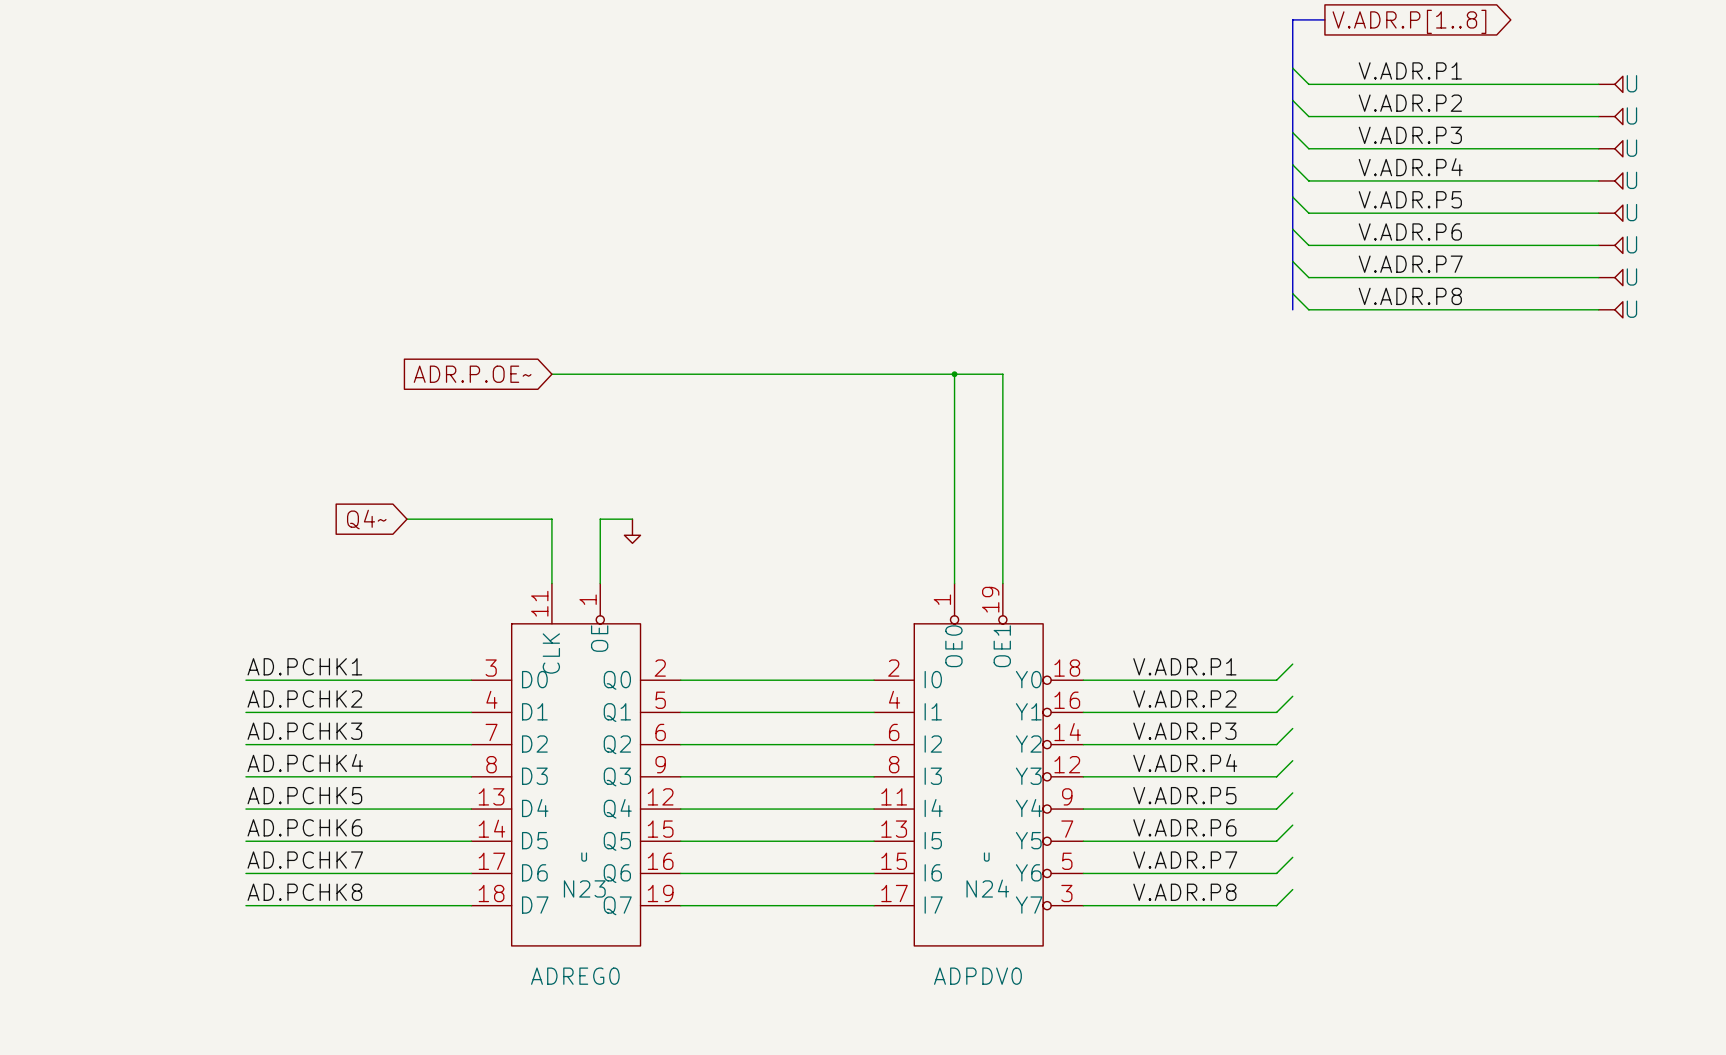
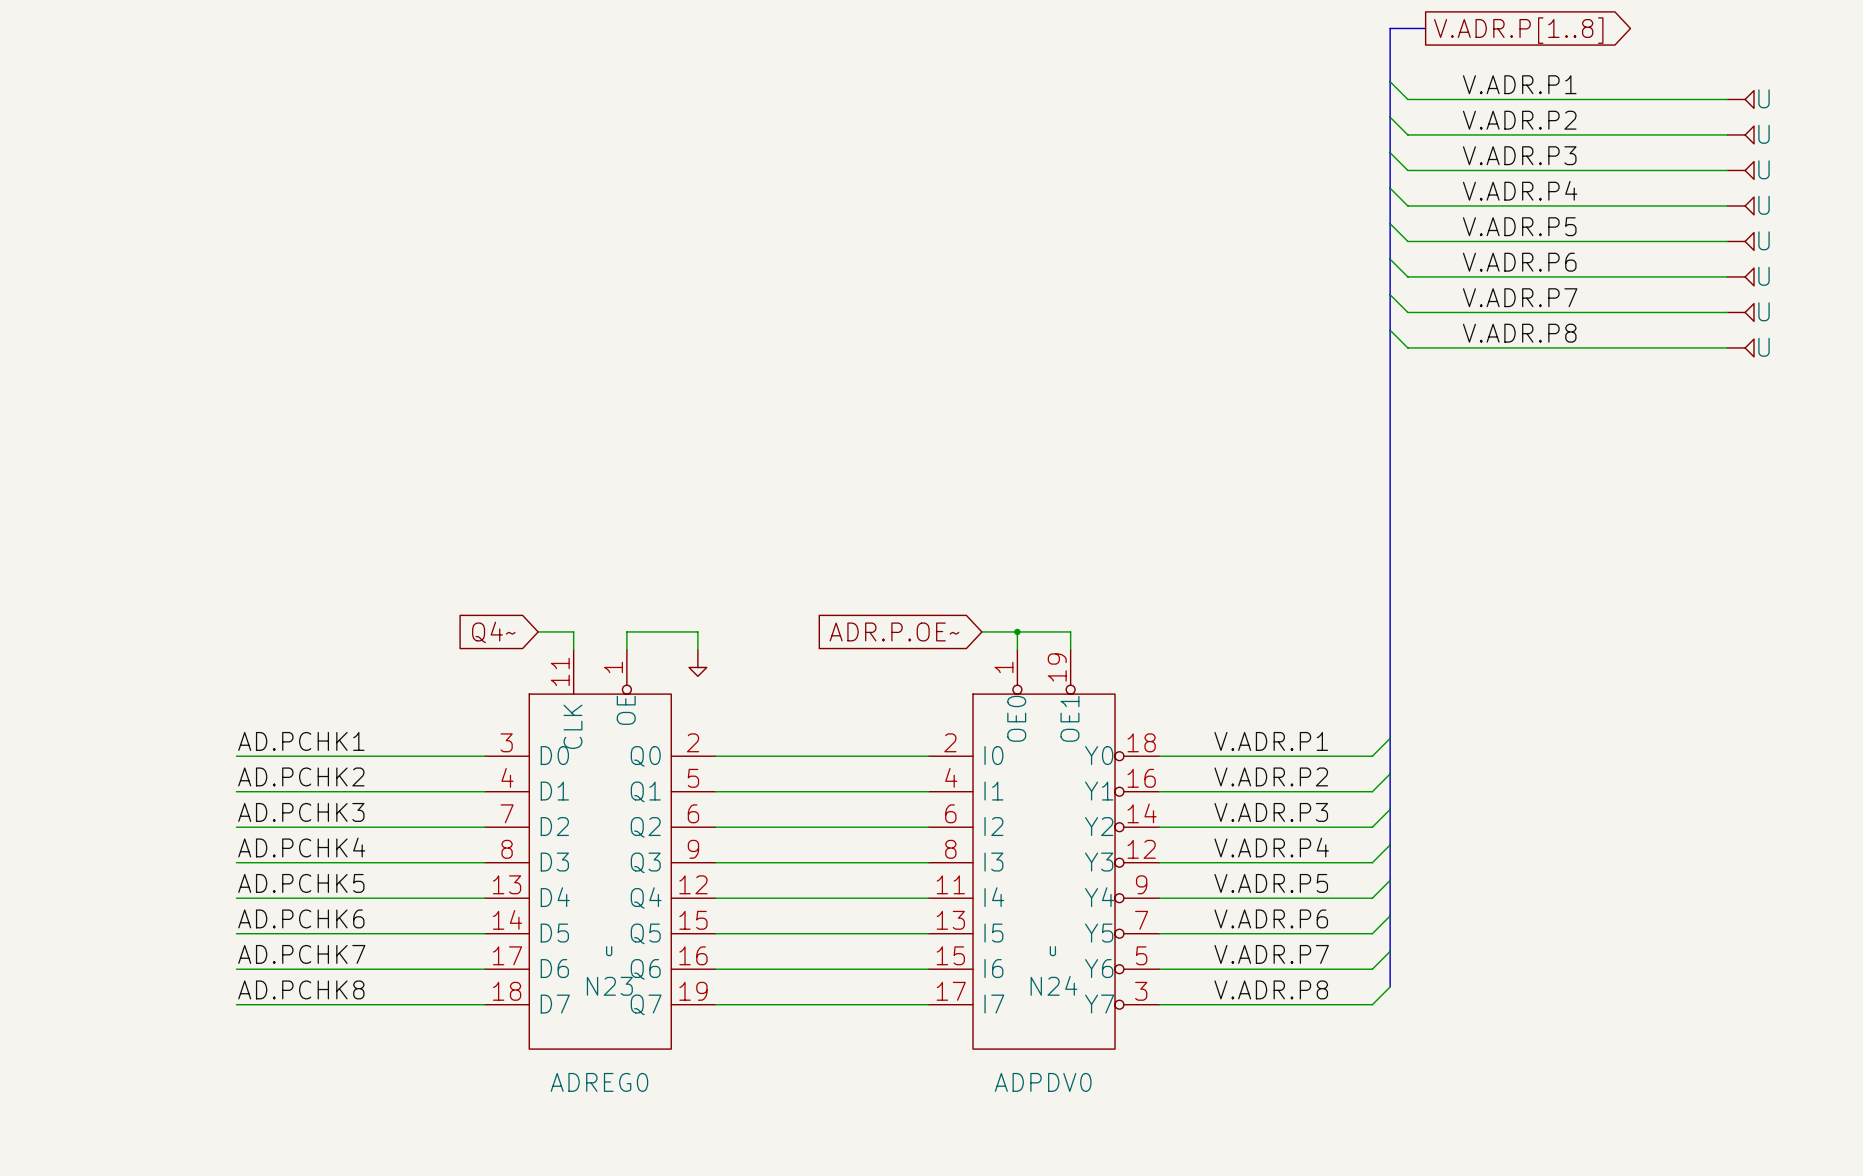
bus: none -> (1390, 347) (1390, 986)
global label: ADR.P.OE~ (472, 374) -> none
wire: (551, 374) (1002, 374) (1002, 567) -> (981, 631) (1070, 631)
wire: (954, 374) (954, 567) -> none
junction: (954, 374) -> none
global label position: Q4~ (366, 519) -> Q4~ (493, 632)
wire: (407, 519) (551, 519) (551, 567) -> (538, 631) (573, 631)
wire: (632, 519) (600, 519) (600, 567) -> (697, 649) (697, 631) (626, 631)
power symbol position: (632, 531) -> (697, 663)
global label: none -> ADR.P.OE~ (894, 631)
junction: none -> (1017, 631)

